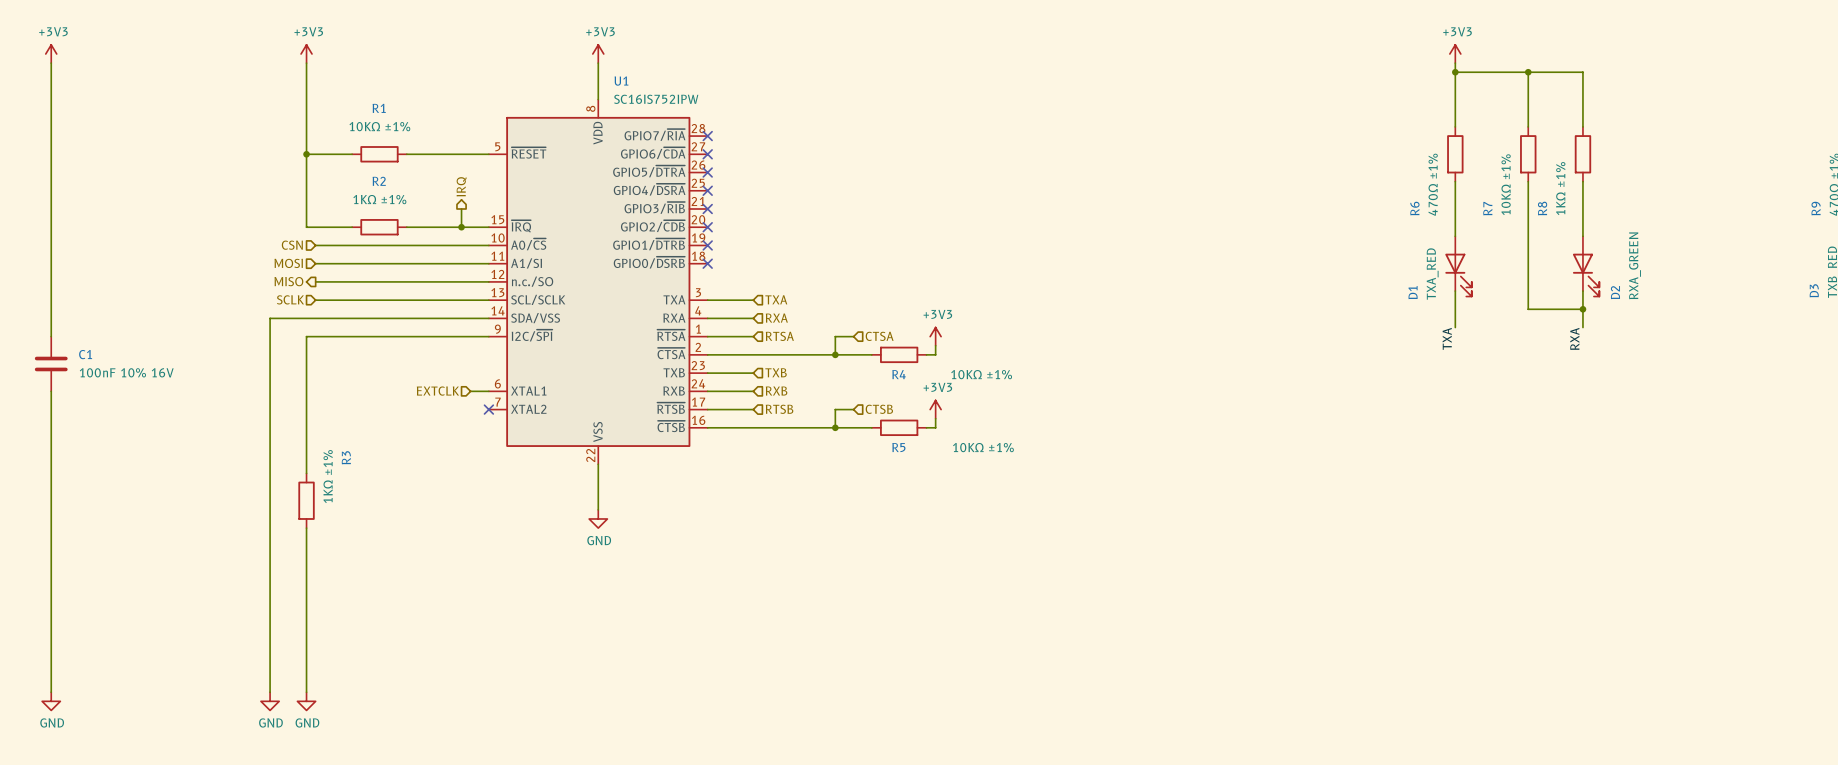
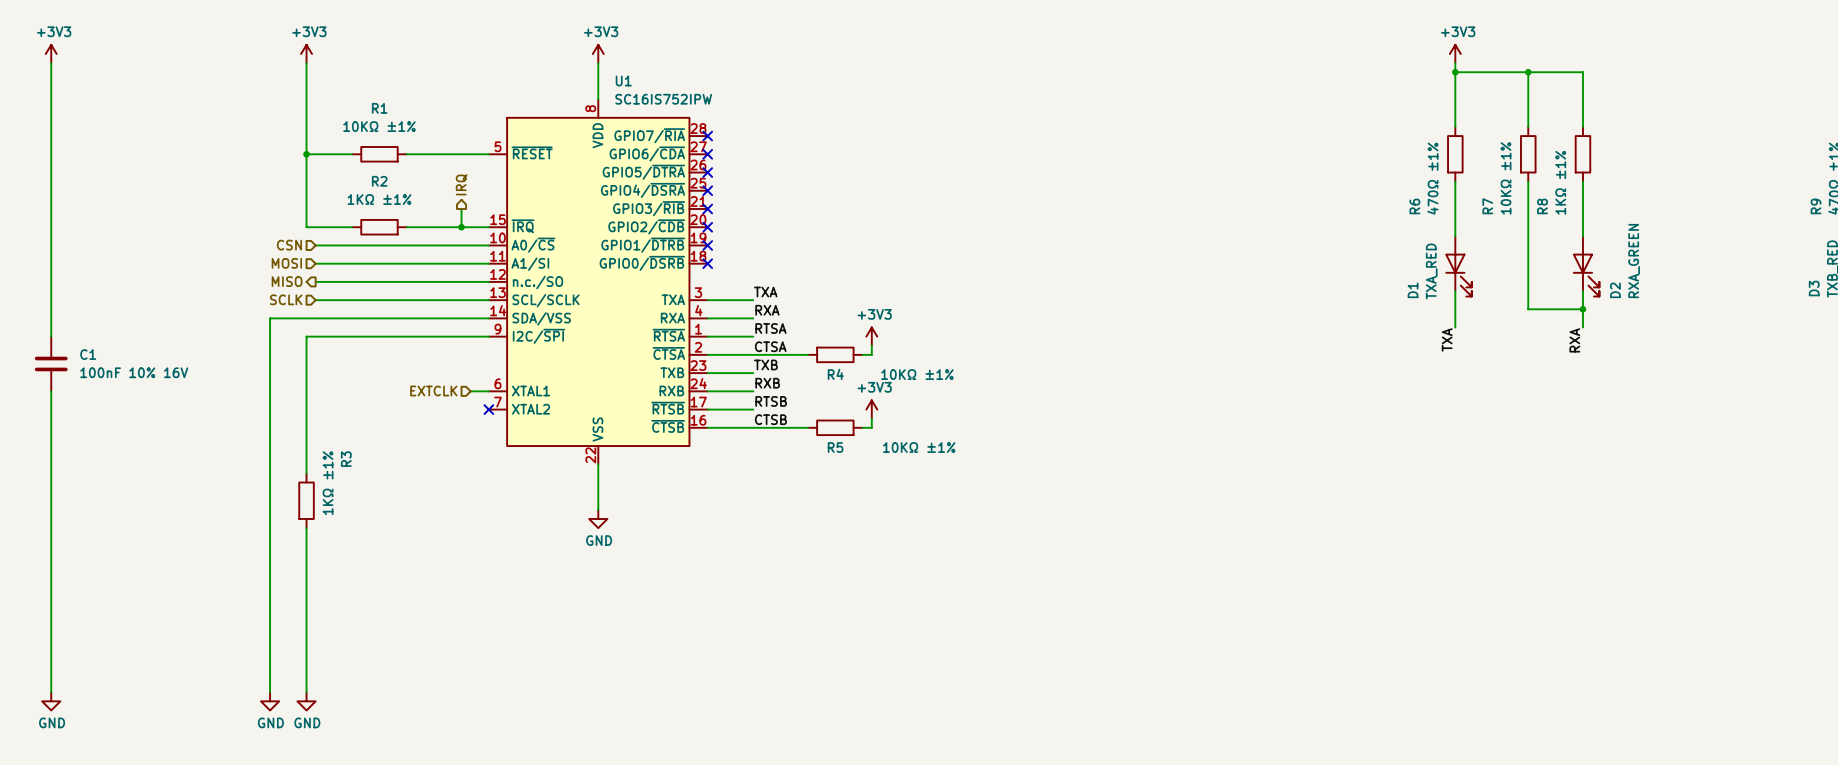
label: none -> TXA (765, 292)
hierarchical label: TXA (776, 299) -> none
label: none -> RXA (767, 310)
hierarchical label: RXA (776, 318) -> none
label: none -> RTSA (770, 328)
hierarchical label: RTSA (779, 336) -> none
wire: (853, 336) (835, 336) (835, 354) -> none
power symbol: none -> +3V3 (871, 336)
hierarchical label: CTSA (879, 336) -> none
power symbol: +3V3 (935, 336) -> none
wire: none -> (871, 345) (871, 354)
wire: (935, 345) (935, 354) (926, 354) -> none
label: none -> CTSA (770, 346)
wire: (807, 354) (862, 354) -> none
junction: (835, 354) -> none
R4 position: (899, 354) -> (835, 354)
label: none -> TXB (765, 364)
hierarchical label: TXB (776, 372) -> none
label: none -> RXB (767, 383)
hierarchical label: RXB (776, 391) -> none
label: none -> RTSB (771, 401)
hierarchical label: RTSB (779, 409) -> none
wire: (853, 409) (835, 409) (835, 427) -> none
power symbol: none -> +3V3 (871, 409)
hierarchical label: CTSB (879, 409) -> none
power symbol: +3V3 (935, 409) -> none
wire: none -> (871, 418) (871, 427)
wire: (935, 418) (935, 427) (926, 427) -> none
label: none -> CTSB (770, 419)
wire: (807, 427) (862, 427) -> none
junction: (835, 427) -> none
R5 position: (899, 427) -> (835, 427)

